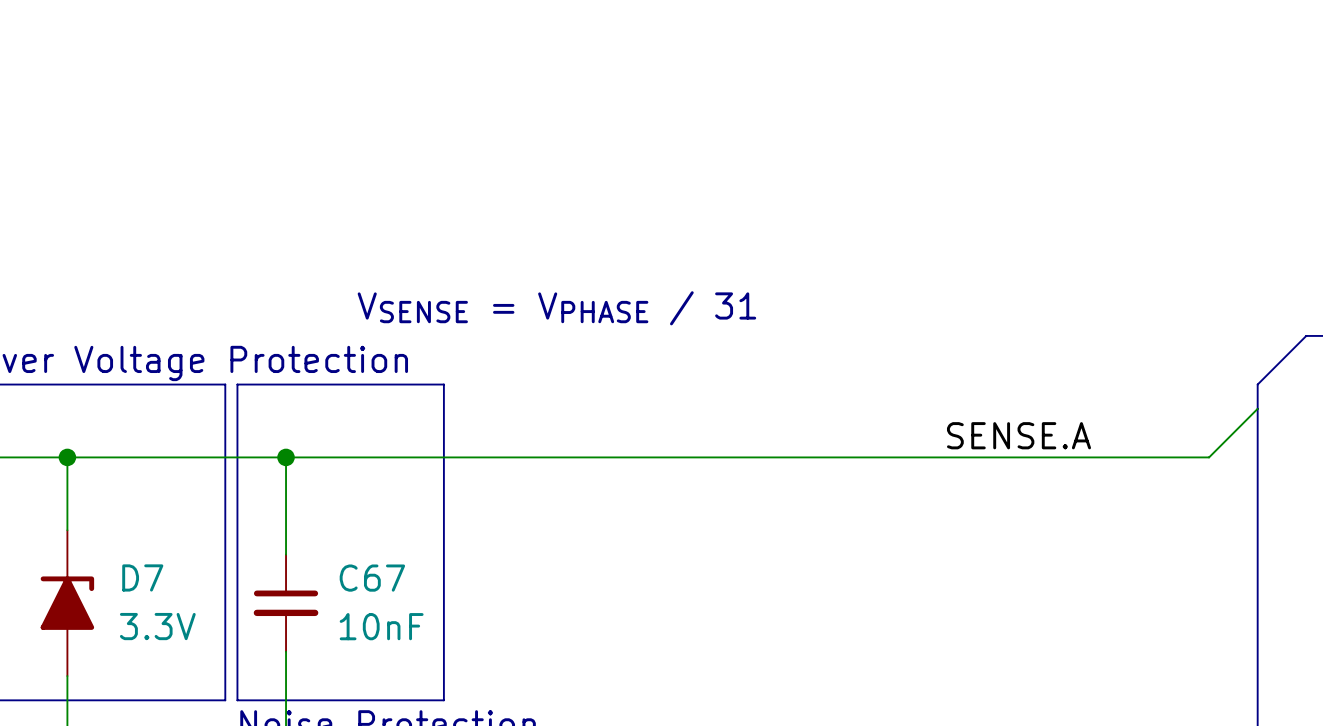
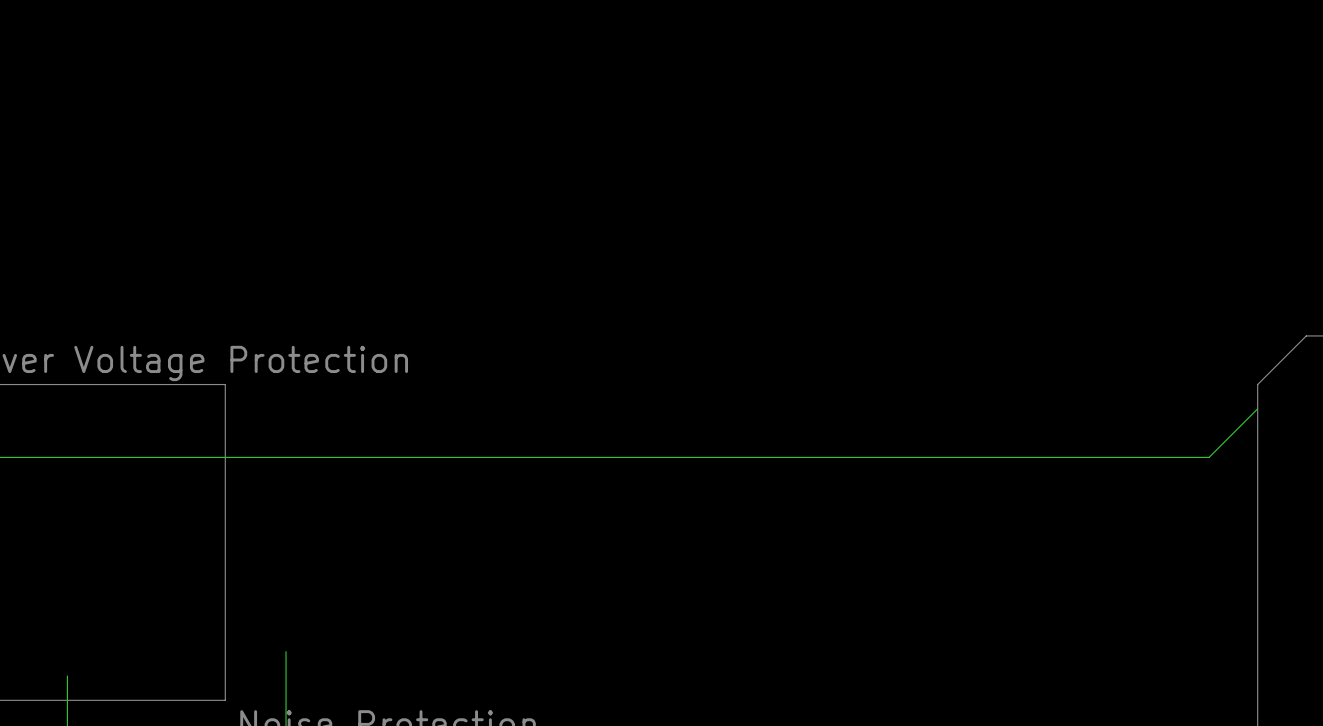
text: VSENSE = VPHASE / 31 (556, 308) -> none
line: (237, 384) (443, 384) (443, 700) (237, 700) (237, 384) -> none
label: SENSE.A (1018, 435) -> none
wire: (67, 457) (67, 530) -> none
junction: (67, 457) -> none
wire: (286, 457) (286, 554) -> none
junction: (286, 457) -> none
D7: 3.3V (67, 603) -> none
C67: 10nF (286, 603) -> none

